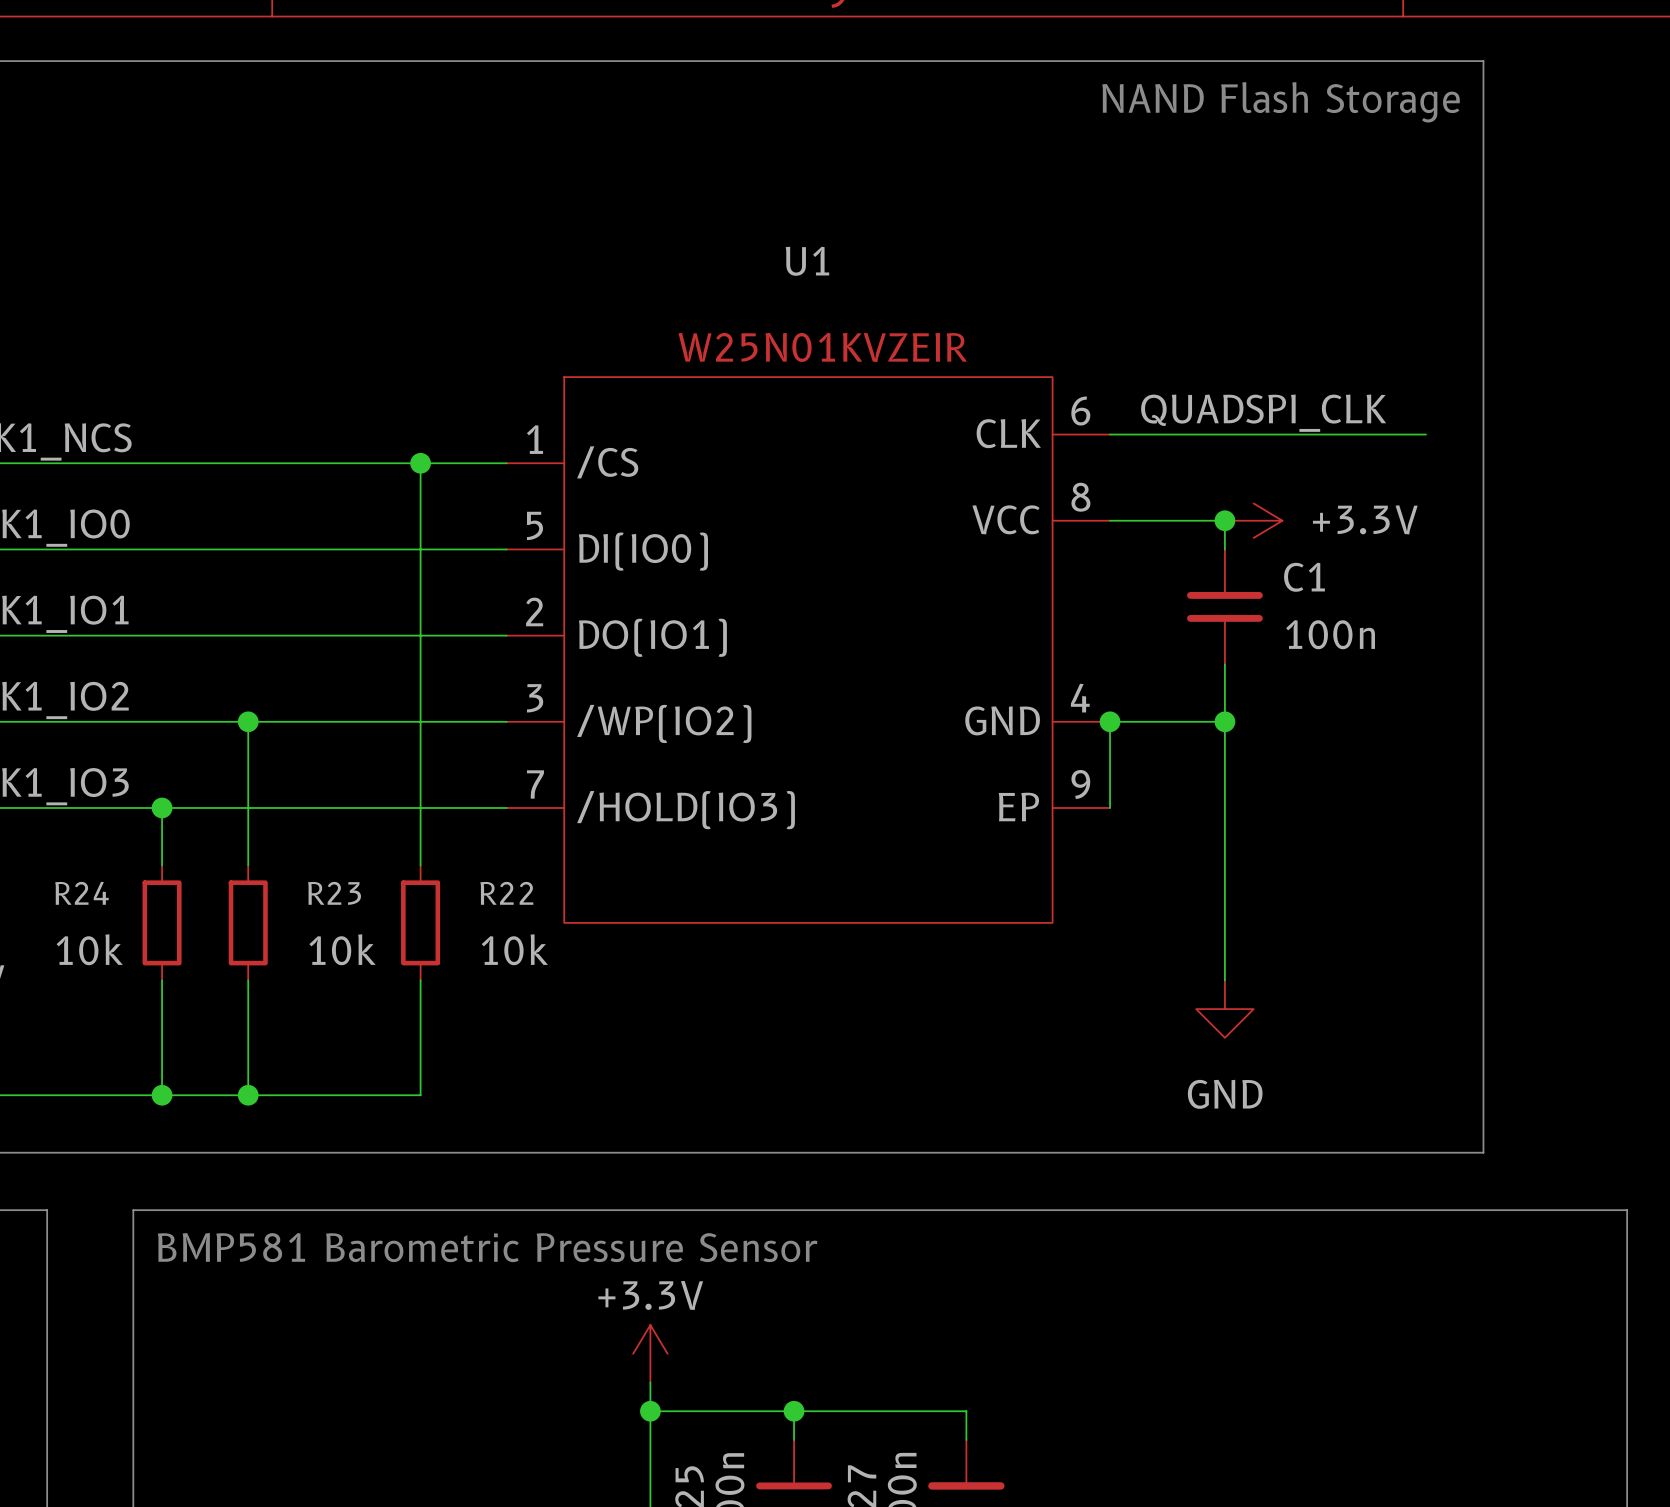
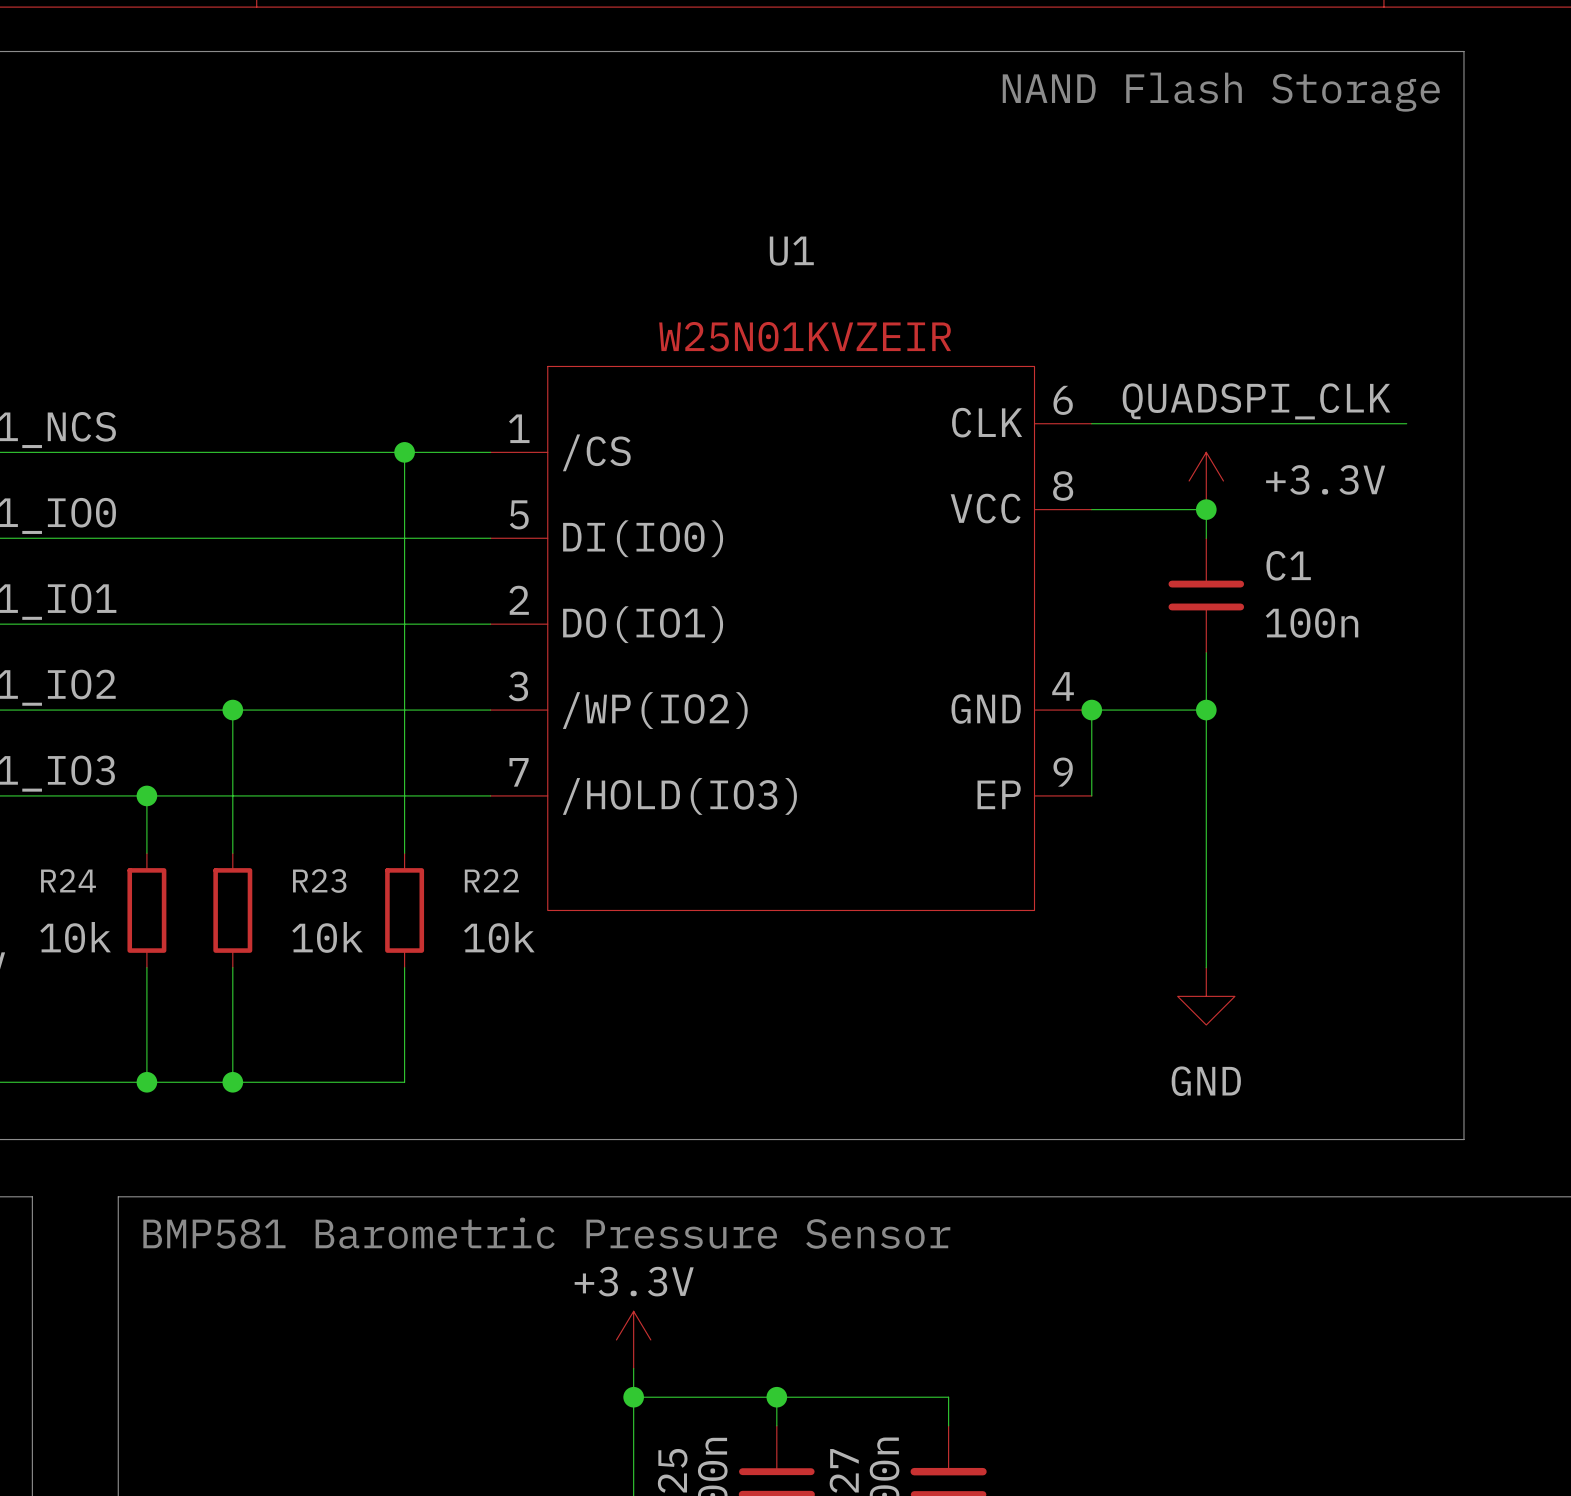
power symbol rotation: 0° (1253, 520) -> 90° counterclockwise (1206, 480)
power symbol position: +3.3V (1253, 520) -> +3.3V (1206, 480)

